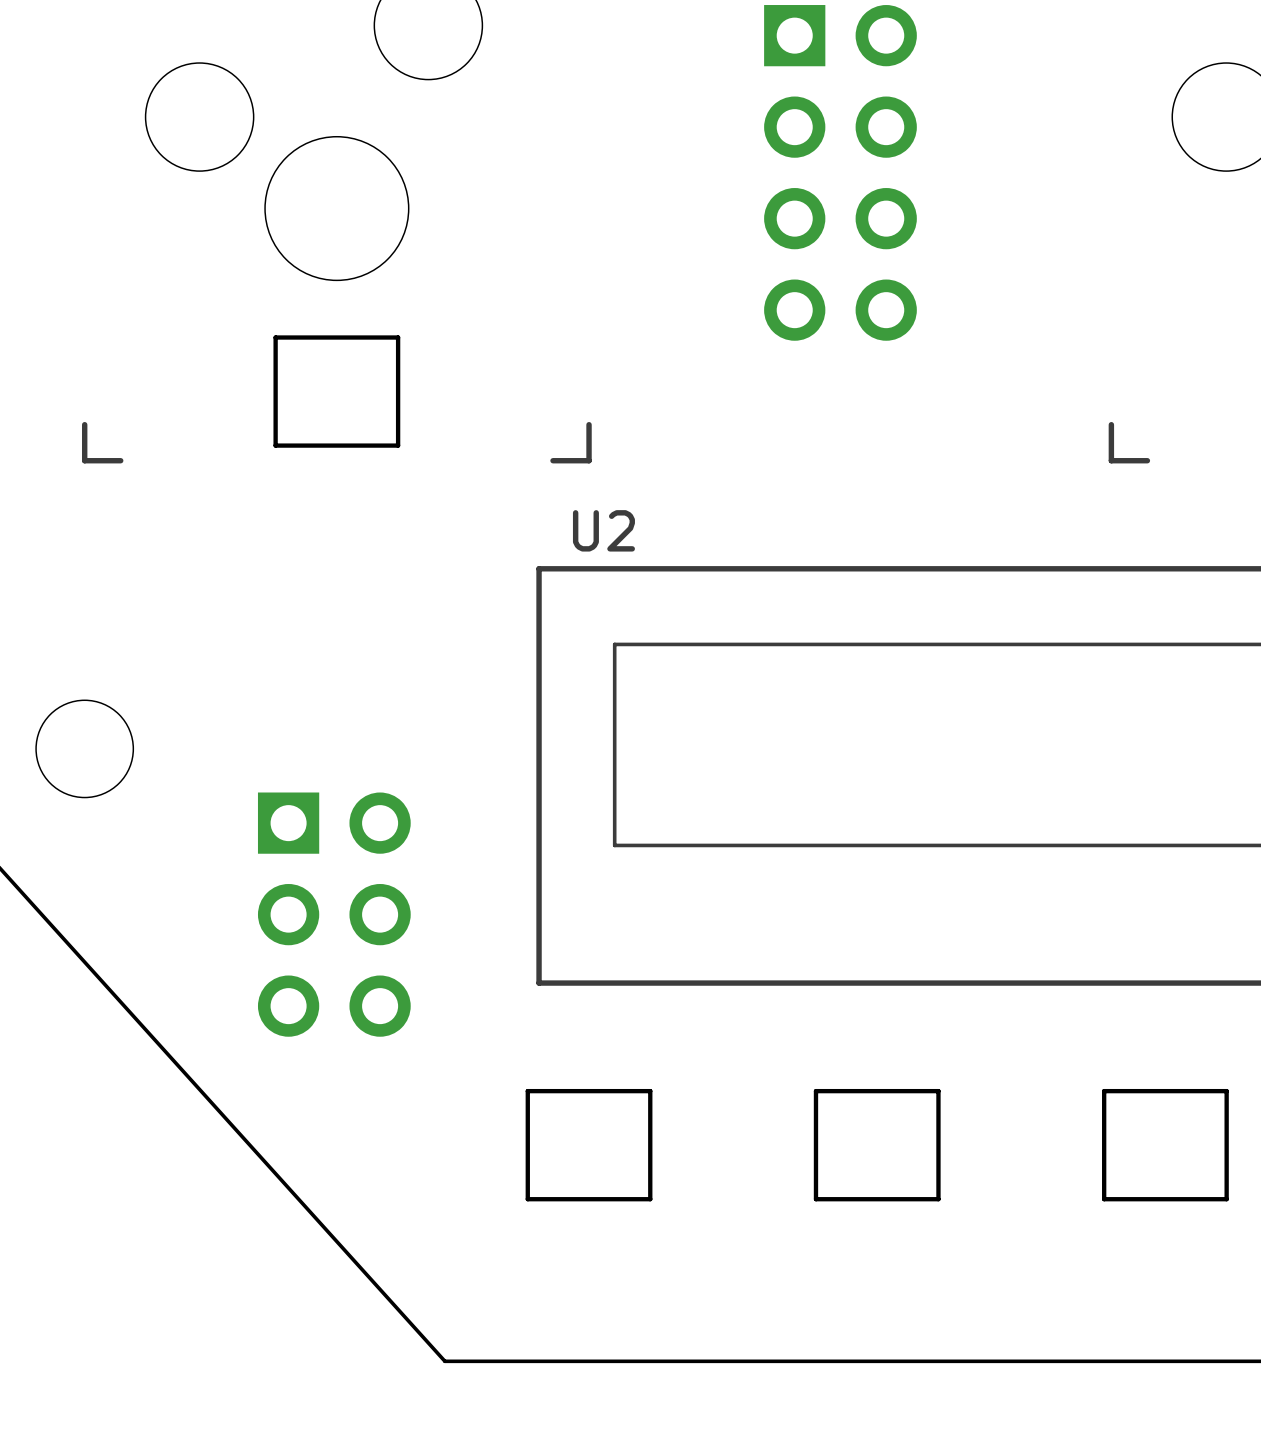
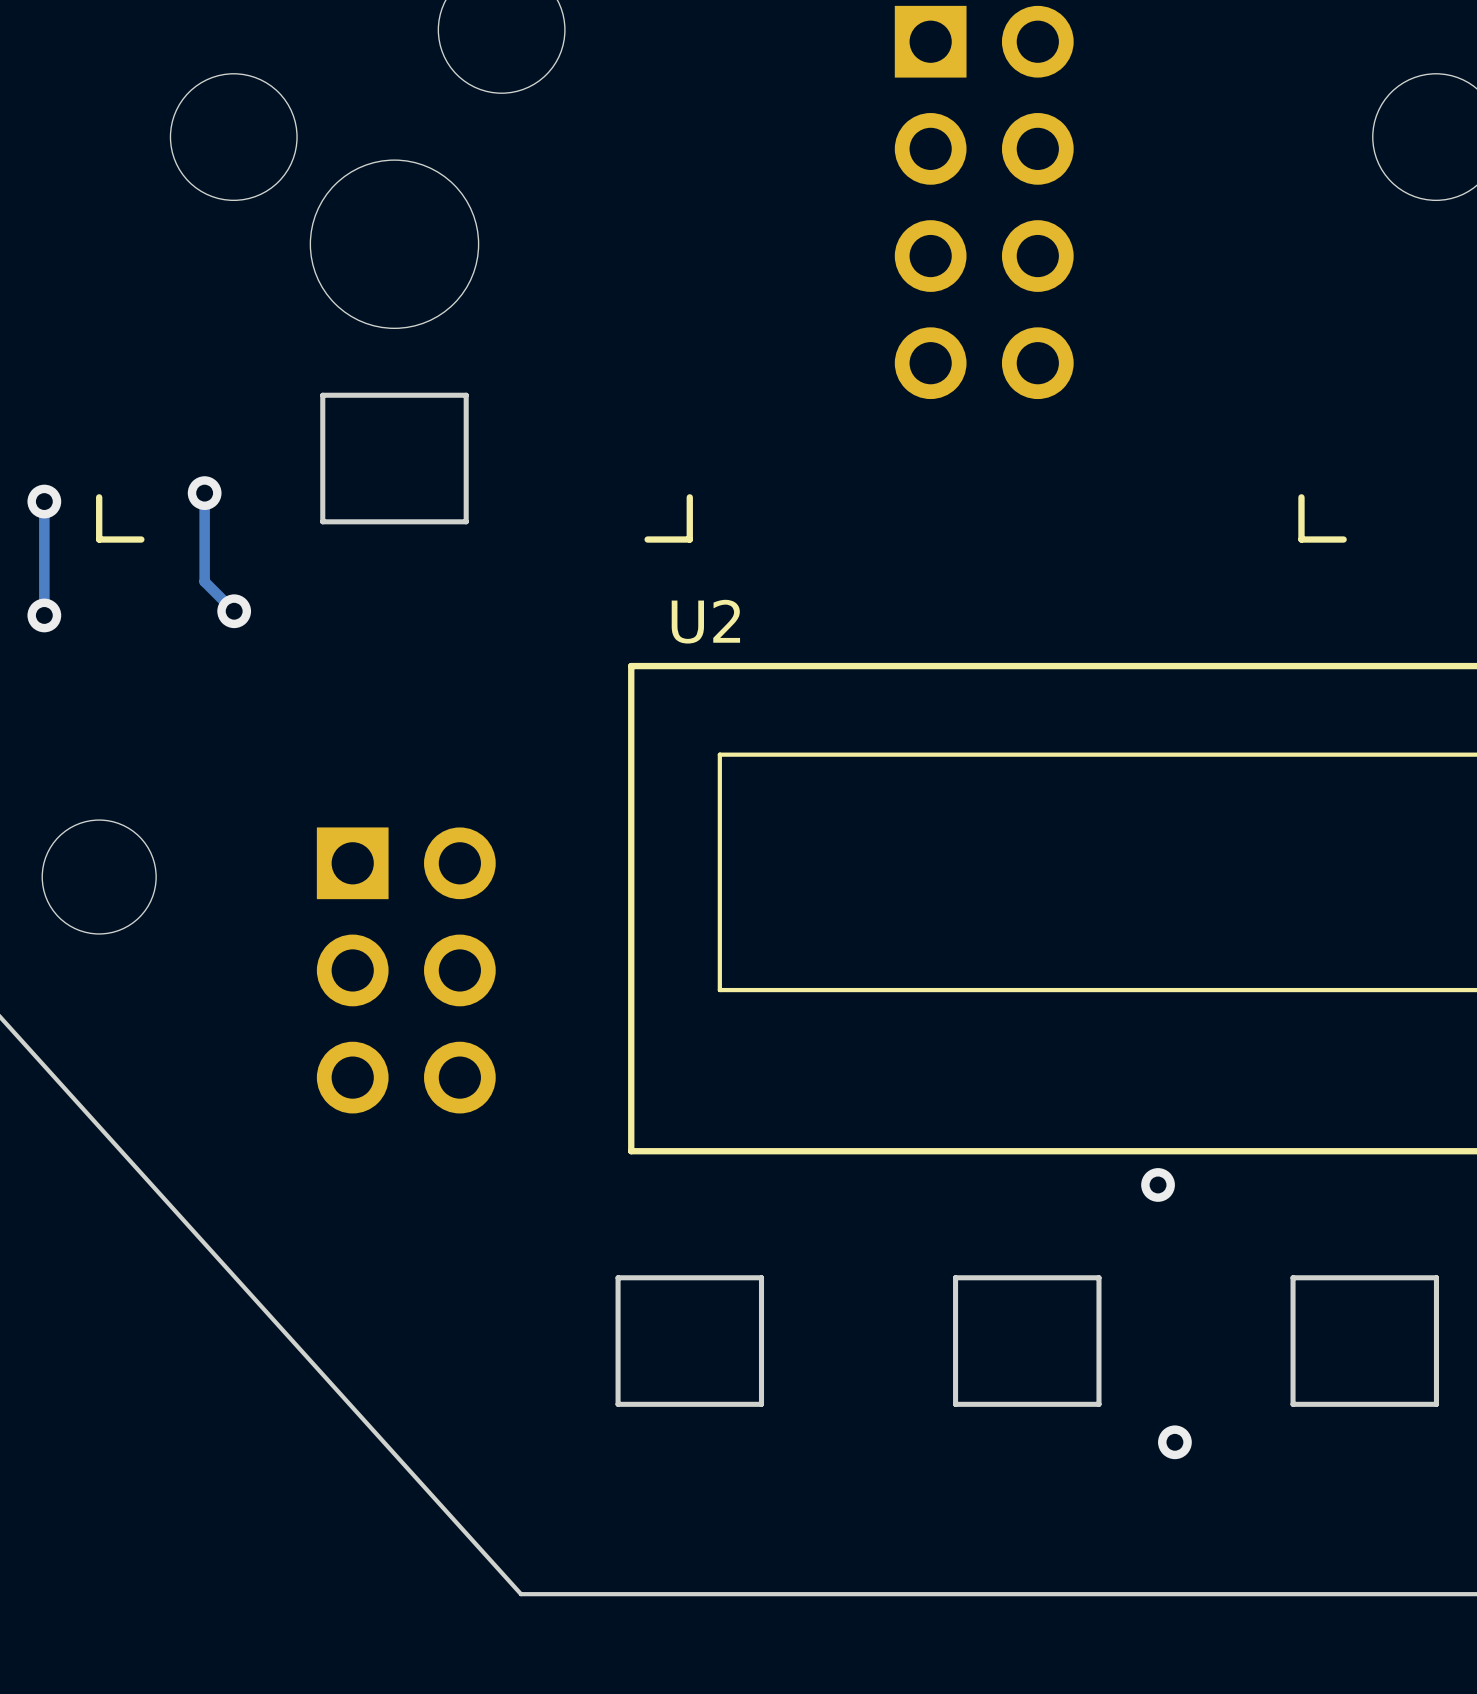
track: none -> (204, 493) (204, 581) (234, 611)
via: none -> (204, 493)
track: none -> (44, 501) (44, 615)
via: none -> (44, 501)
via: none -> (234, 611)
via: none -> (44, 615)
part position: (334, 914) -> (406, 970)
via: none -> (1158, 1184)
via: none -> (1174, 1442)

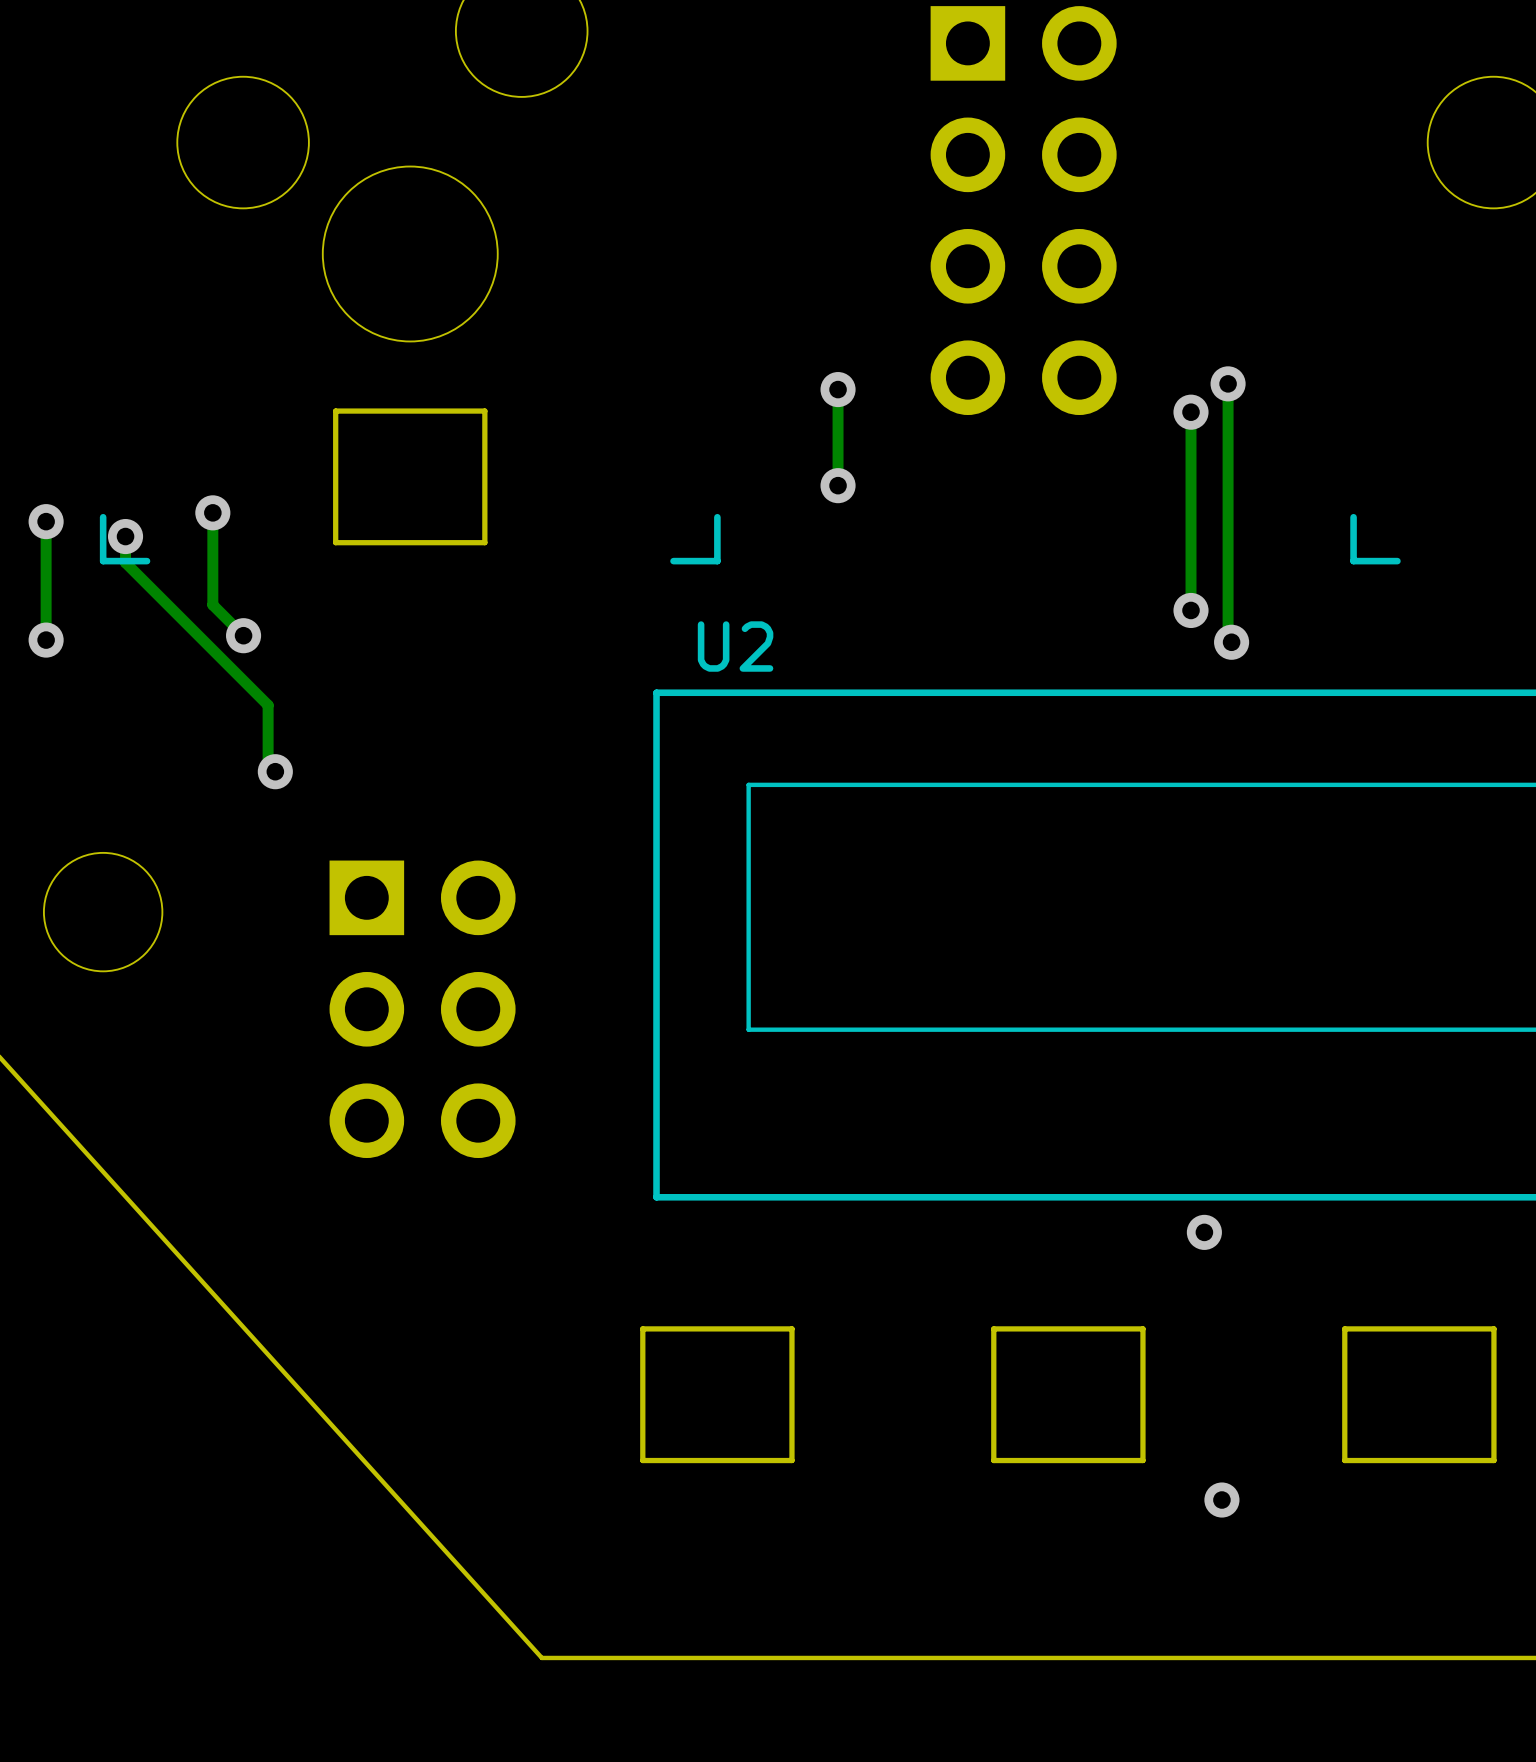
track: none -> (1228, 383) (1228, 638) (1231, 642)
via: none -> (1228, 383)
track: none -> (838, 389) (838, 485)
via: none -> (838, 389)
track: none -> (1190, 412) (1191, 610)
via: none -> (1191, 412)
via: none -> (838, 485)
track: none -> (125, 536) (125, 562) (268, 705) (268, 771) (275, 771)
via: none -> (125, 536)
via: none -> (1191, 610)
via: none -> (1231, 642)
via: none -> (275, 771)

